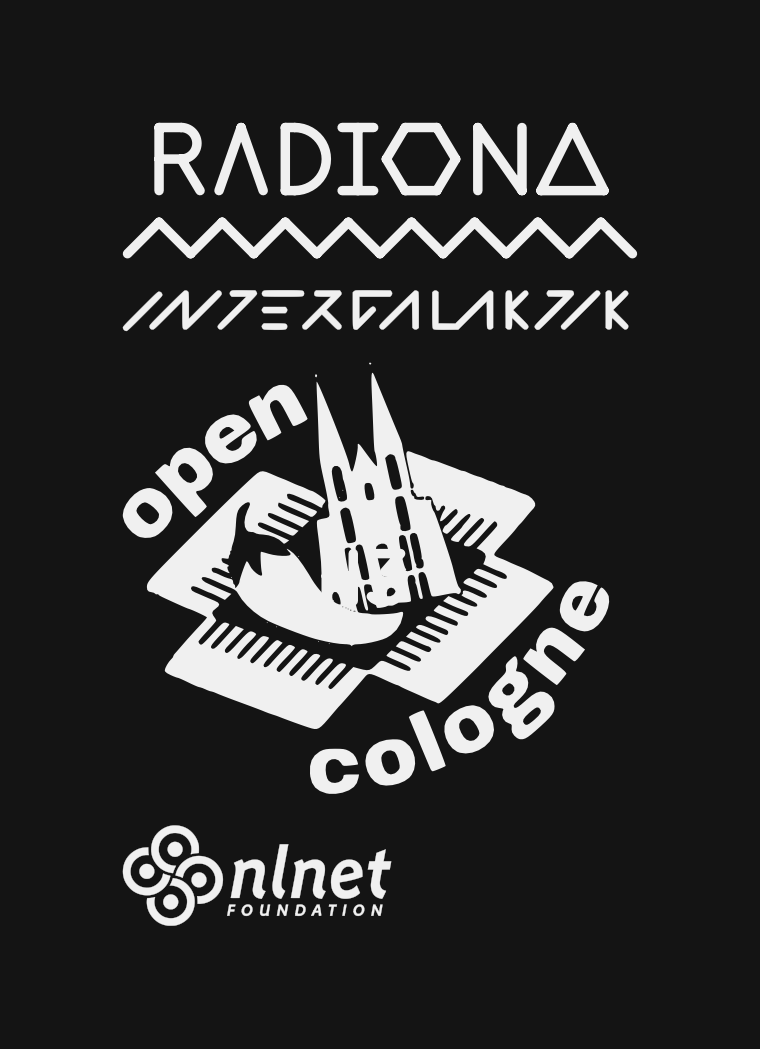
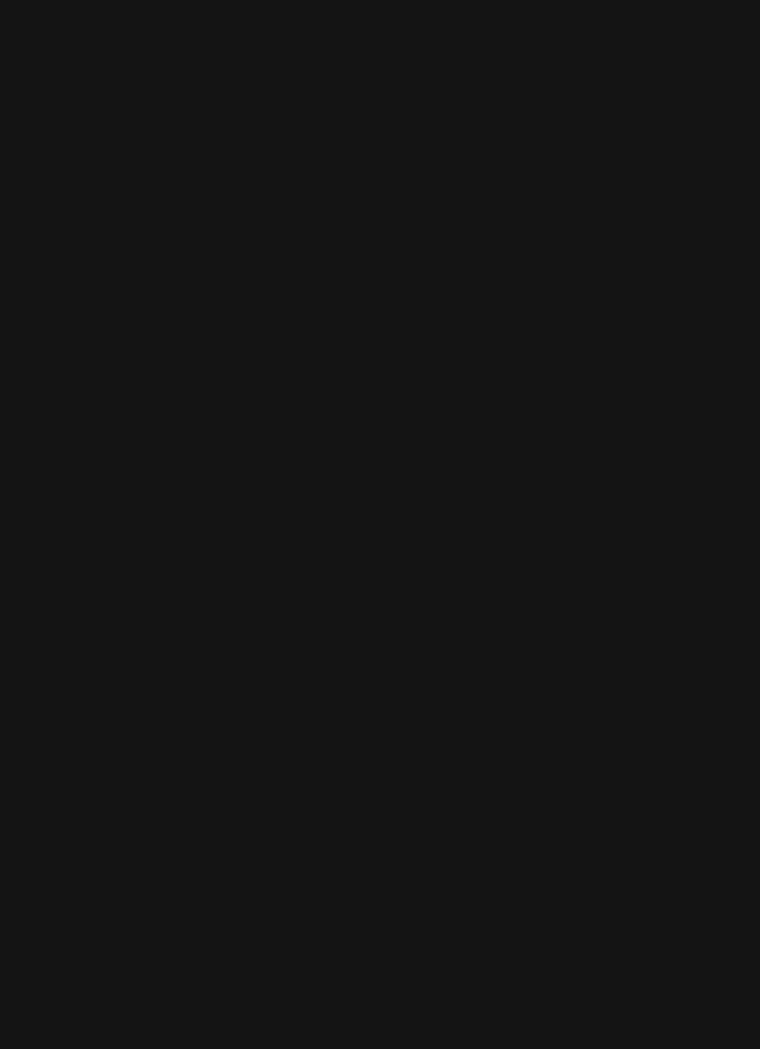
drawing: [122, 122, 638, 332] -> none
part: (365, 578) -> none
drawing: [122, 825, 392, 926] -> none

